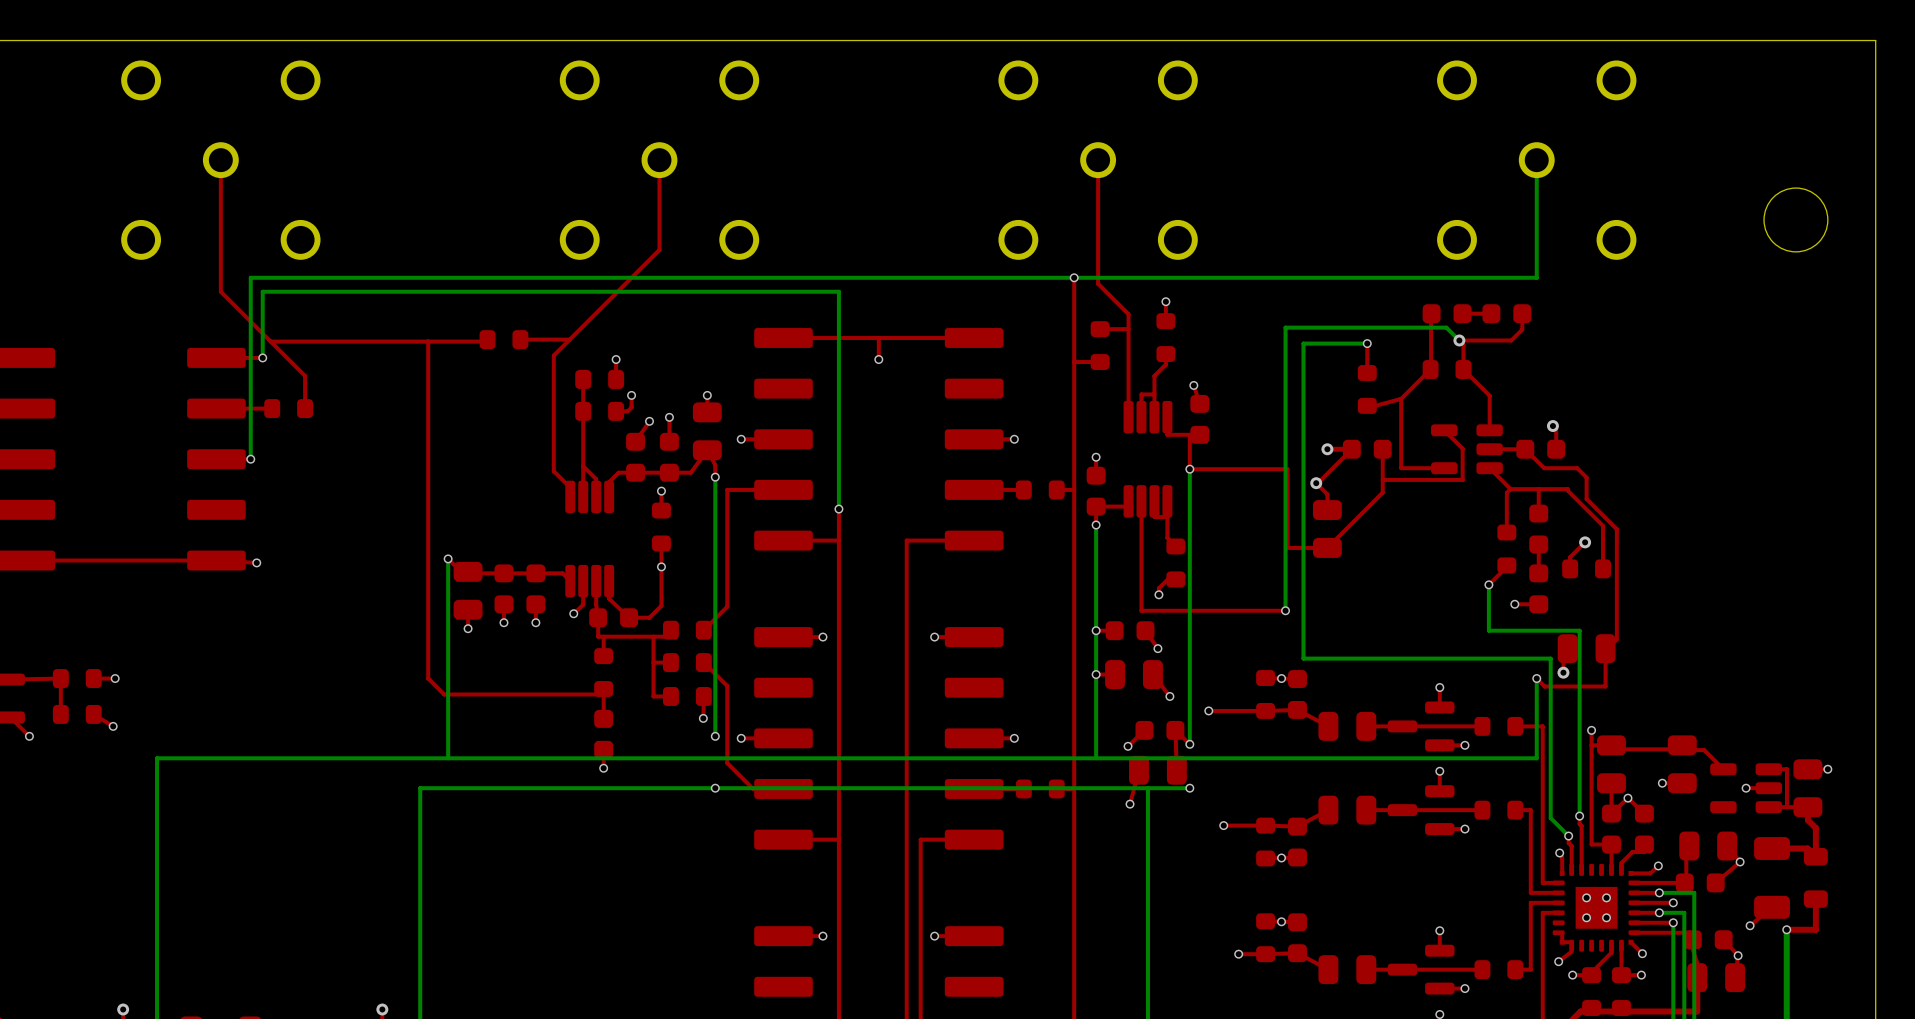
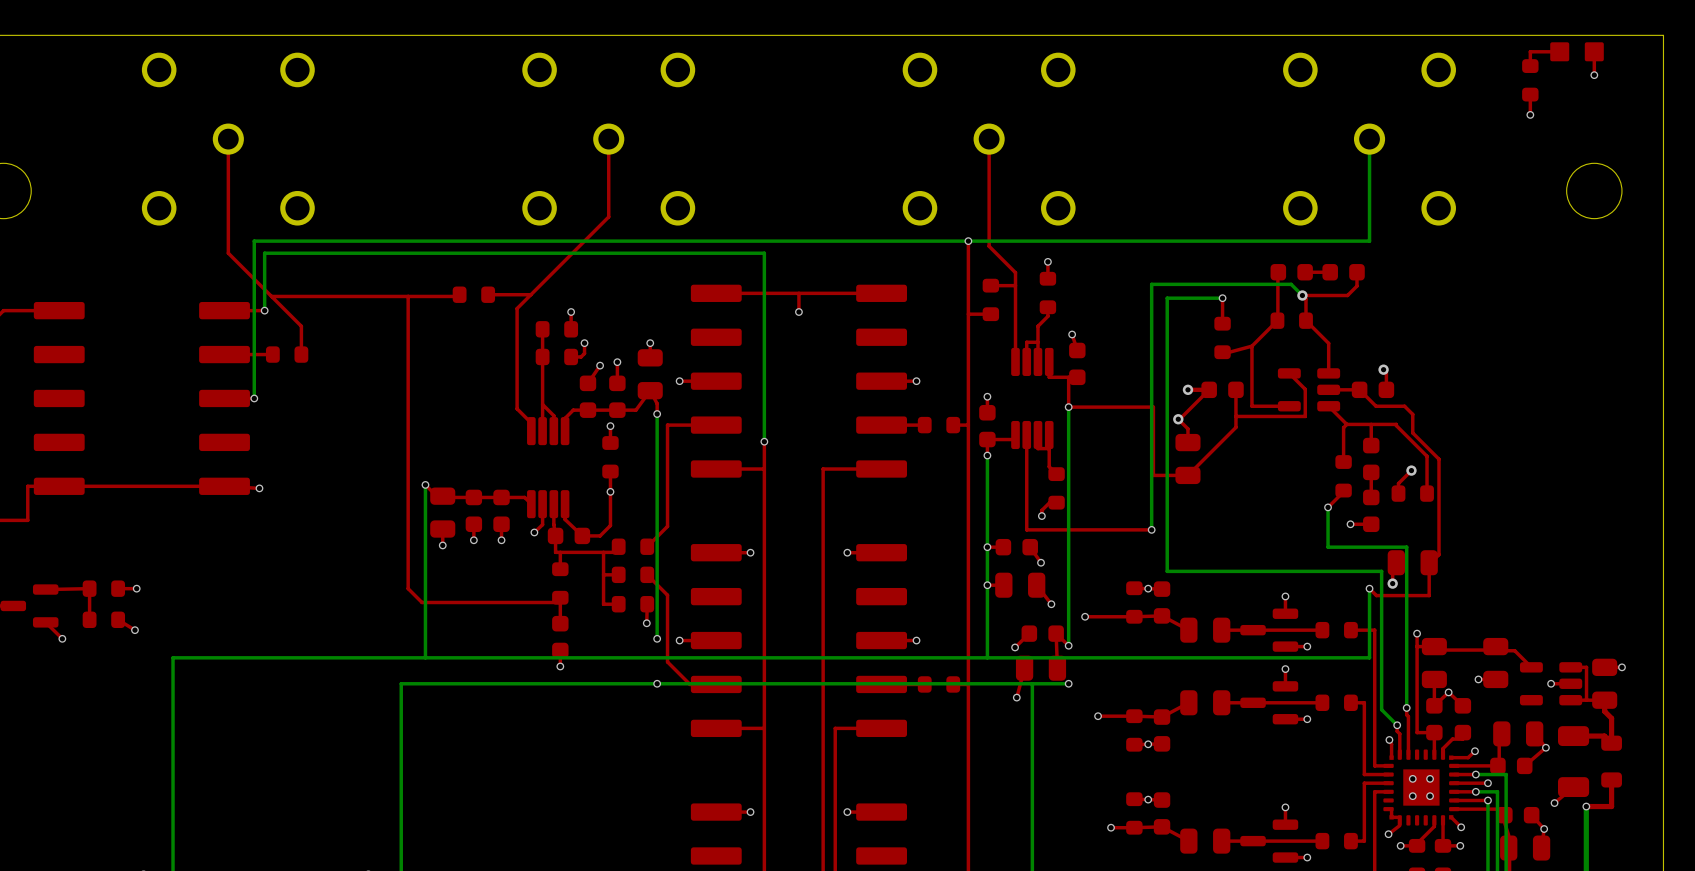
top track: none -> (1559, 51) (1530, 51) (1530, 66)
part: none -> (1577, 51)
top track: none -> (1594, 51) (1594, 75)
via: none -> (1594, 75)
part: none -> (1530, 80)
top track: none -> (1530, 94) (1530, 114)
via: none -> (1530, 114)

